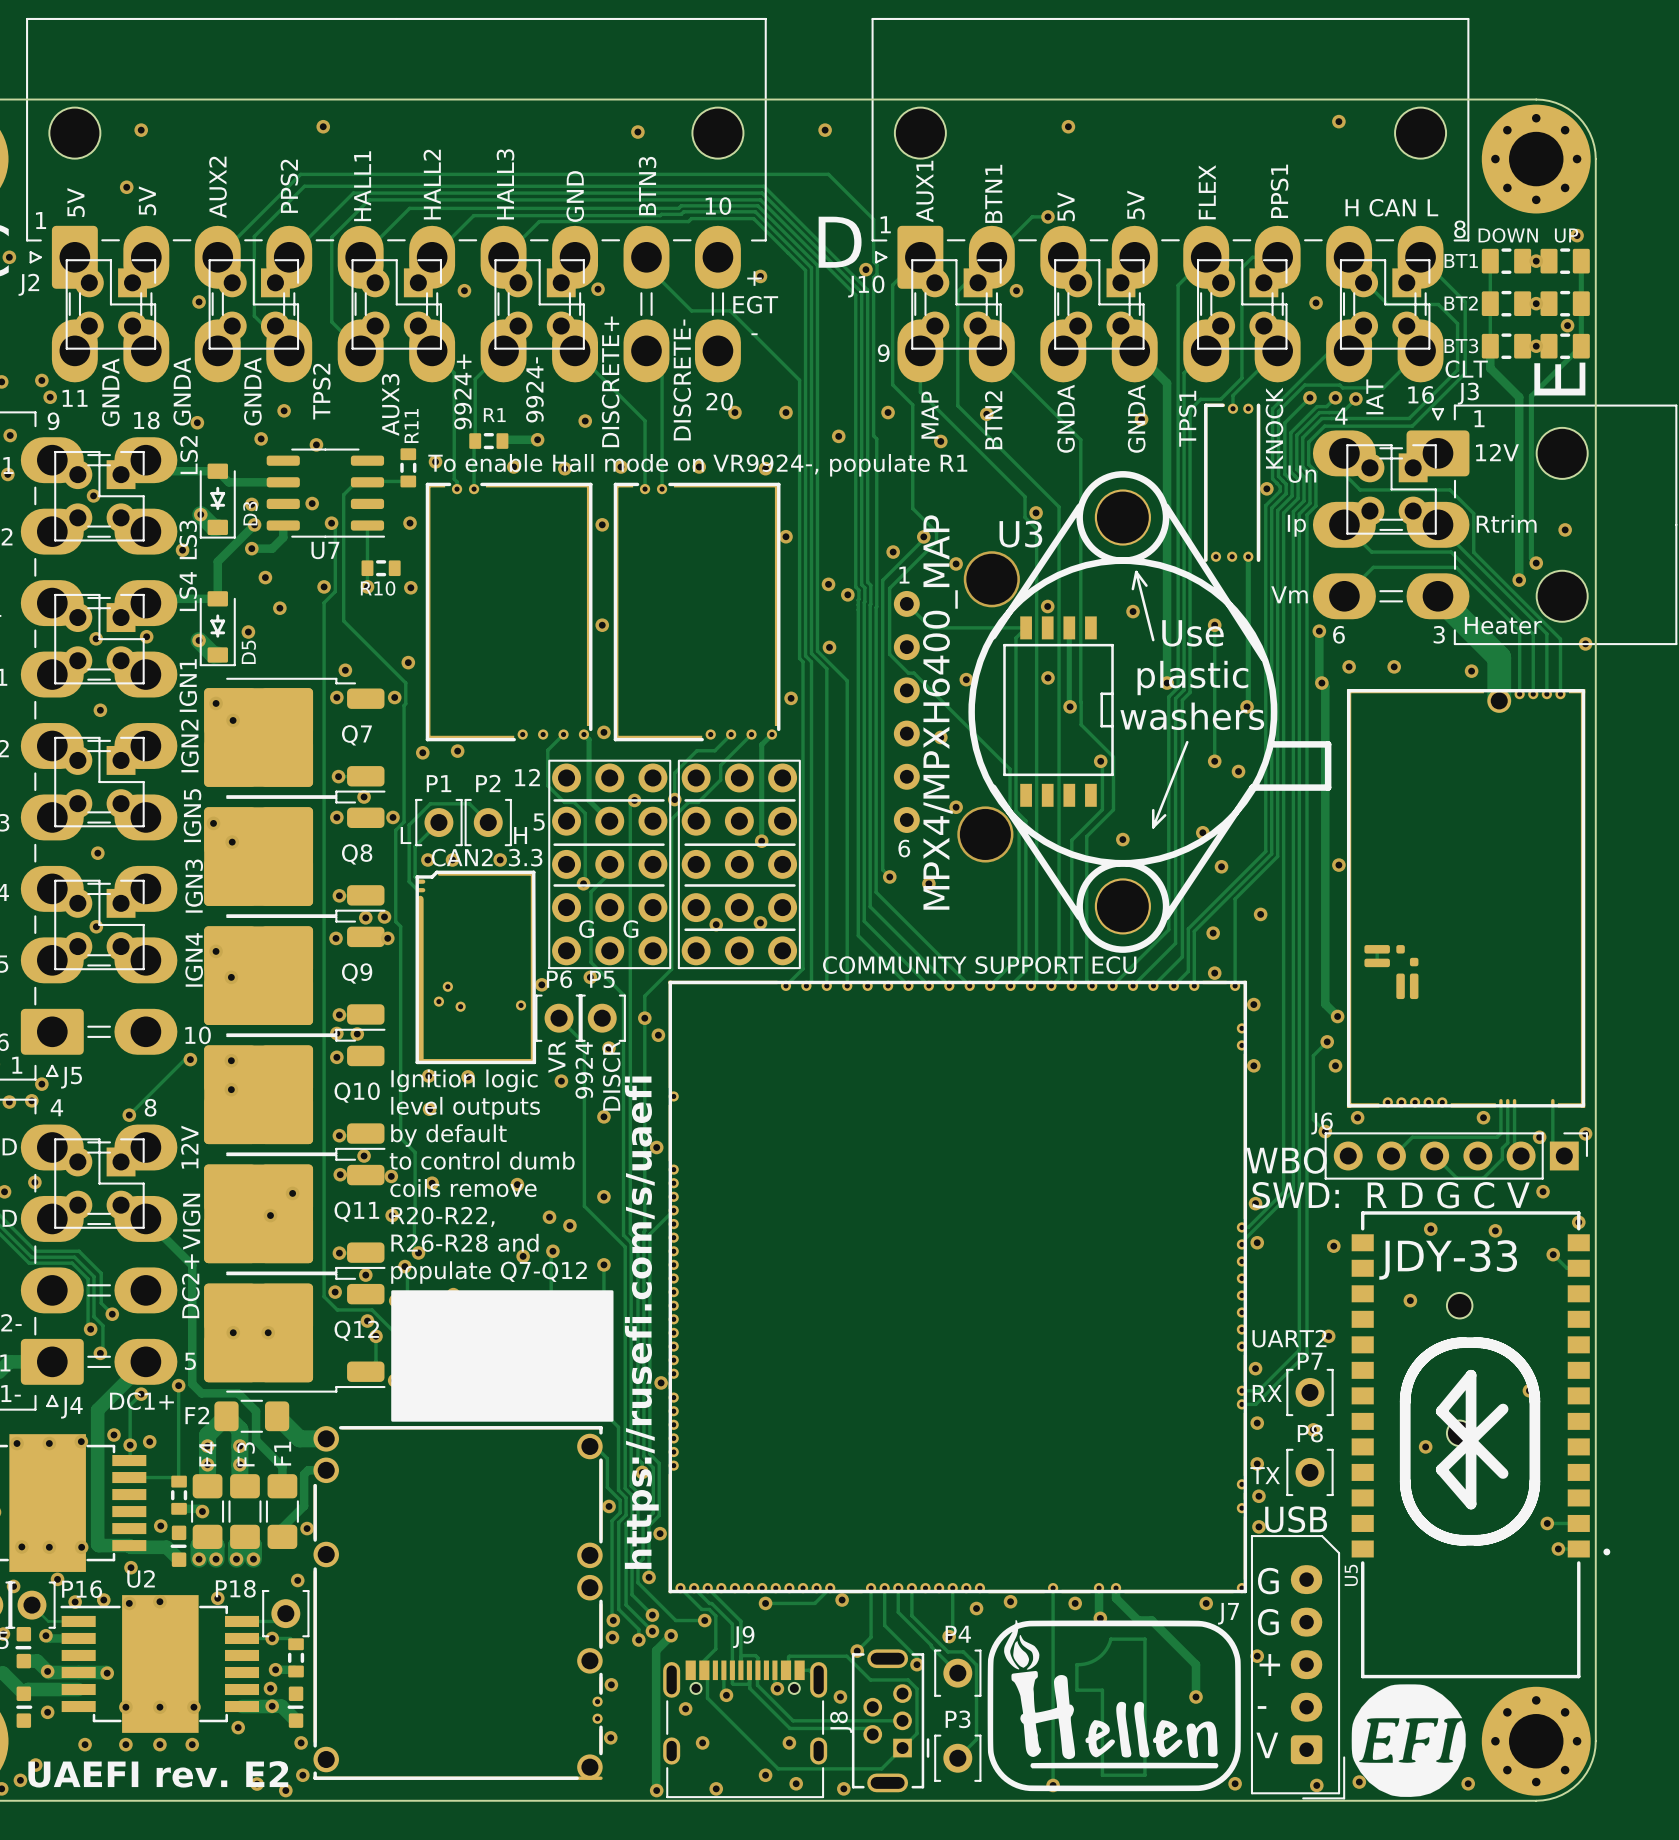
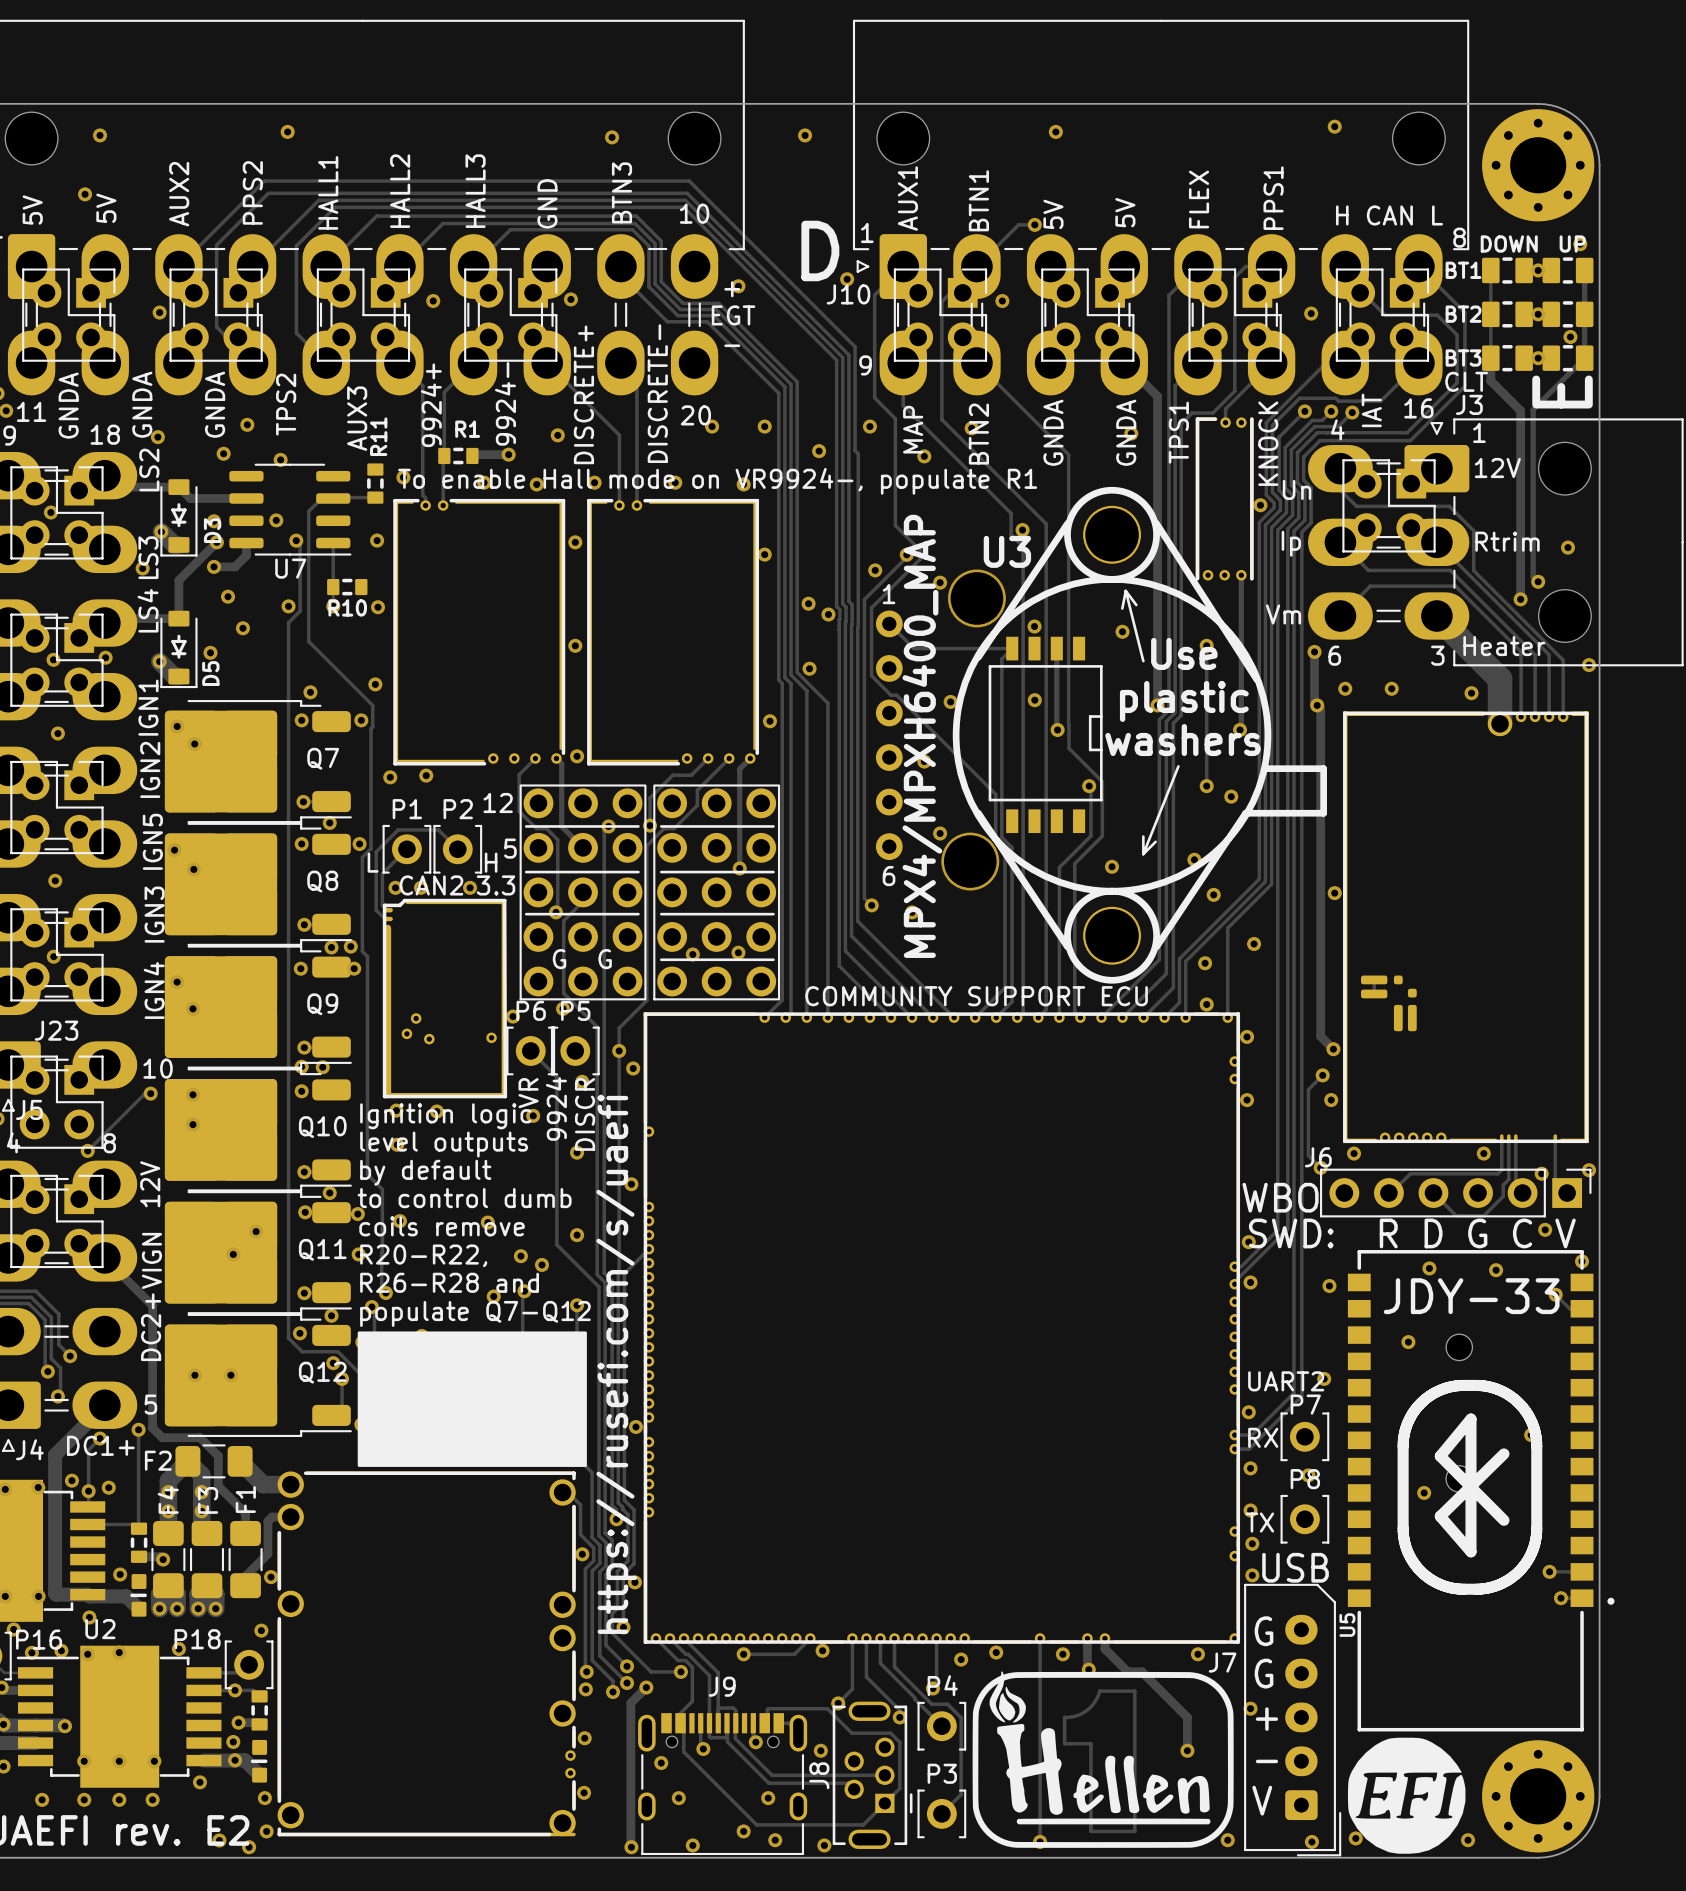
track: (712, 174) (828, 174) (873, 219) (873, 261) (877, 265) (877, 274) (873, 277) (873, 335) -> (689, 181) (855, 346)
track: (710, 186) (763, 186) (867, 290) (867, 343) -> (687, 193) (848, 355)
track: (709, 193) (762, 193) (861, 292) (861, 345) -> (685, 200) (842, 357)
track: (707, 199) (760, 199) (855, 295) (855, 348) -> (683, 207) (836, 360)
track: (661, 208) (678, 208) (681, 205) (757, 205) (817, 265) (817, 369) -> (636, 216) (661, 241) (661, 281) (682, 303) (718, 303) (797, 381)
track: (660, 215) (681, 214) (683, 211) (755, 211) (811, 267) (811, 371) -> (635, 223) (655, 243) (655, 284) (680, 309) (716, 309) (791, 384)
track: (657, 221) (688, 221) (691, 218) (753, 218) (805, 270) (805, 374) -> (632, 229) (648, 246) (648, 286) (677, 315) (713, 315) (784, 386)
J23: none -> (56, 1102)

